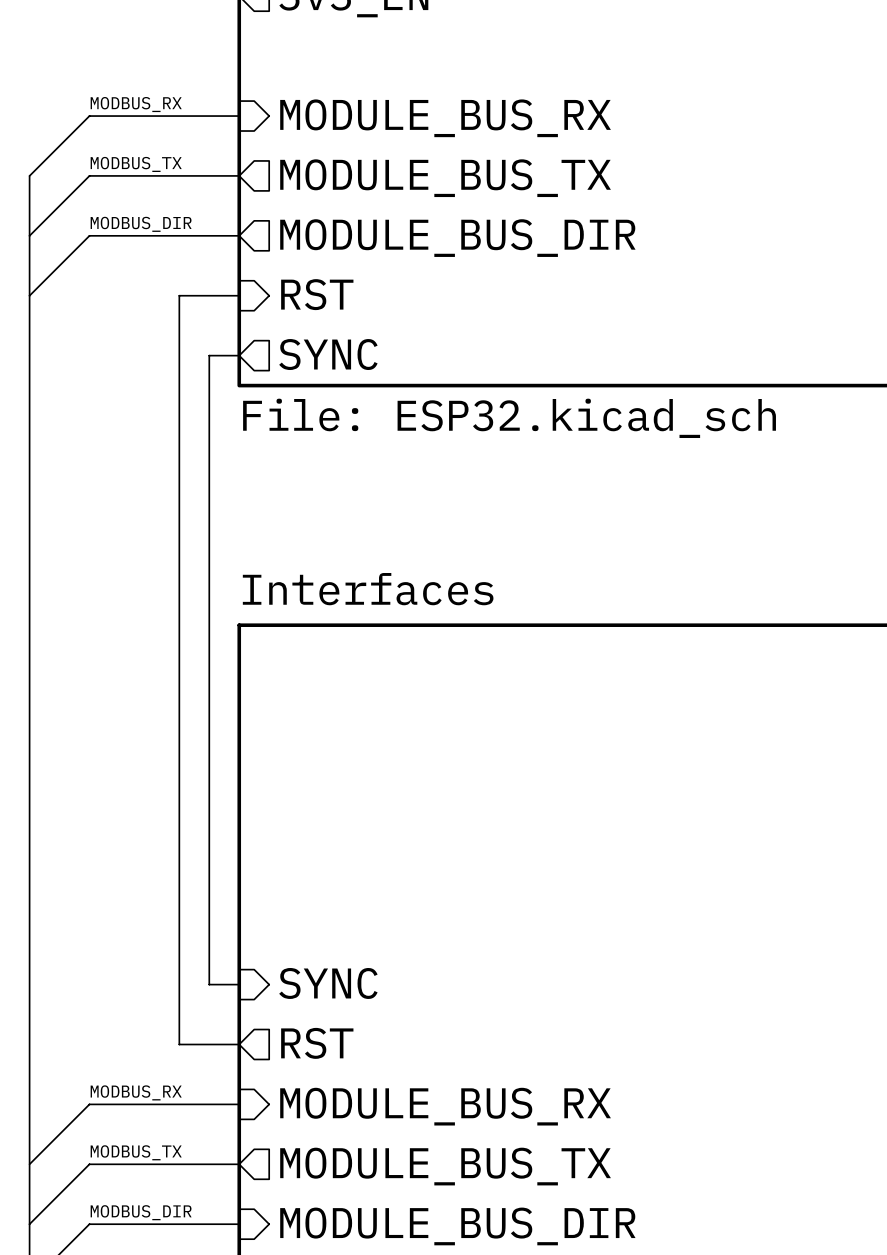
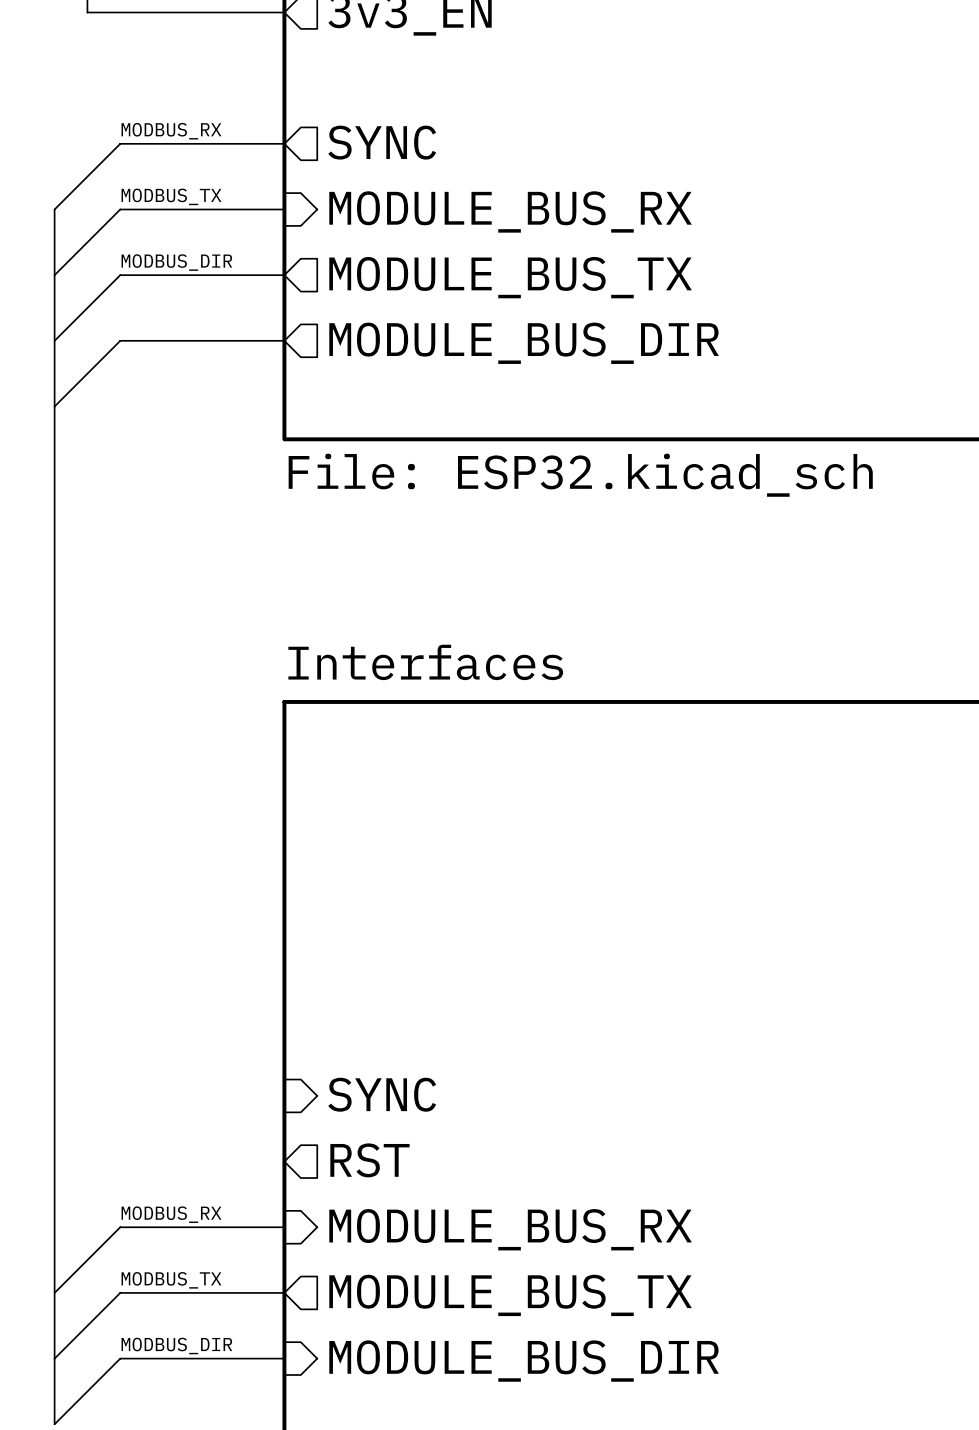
sheet pin shape: input (445, 118) -> output (382, 142)
sheet pin: MODULE_BUS_RX (445, 118) -> SYNC (382, 142)
sheet pin shape: output (445, 178) -> input (510, 211)
sheet pin: MODULE_BUS_TX (445, 178) -> MODULE_BUS_RX (510, 211)
sheet pin: MODULE_BUS_DIR (457, 238) -> MODULE_BUS_TX (510, 277)
sheet pin shape: input (317, 294) -> output (524, 343)
sheet pin: RST (317, 294) -> MODULE_BUS_DIR (524, 343)
wire: (179, 295) (179, 1044) (239, 1044) -> (218, 340) (120, 340) (54, 406)
sheet pin: SYNC (328, 354) -> none
wire: (239, 355) (209, 355) (209, 984) (239, 984) -> none

